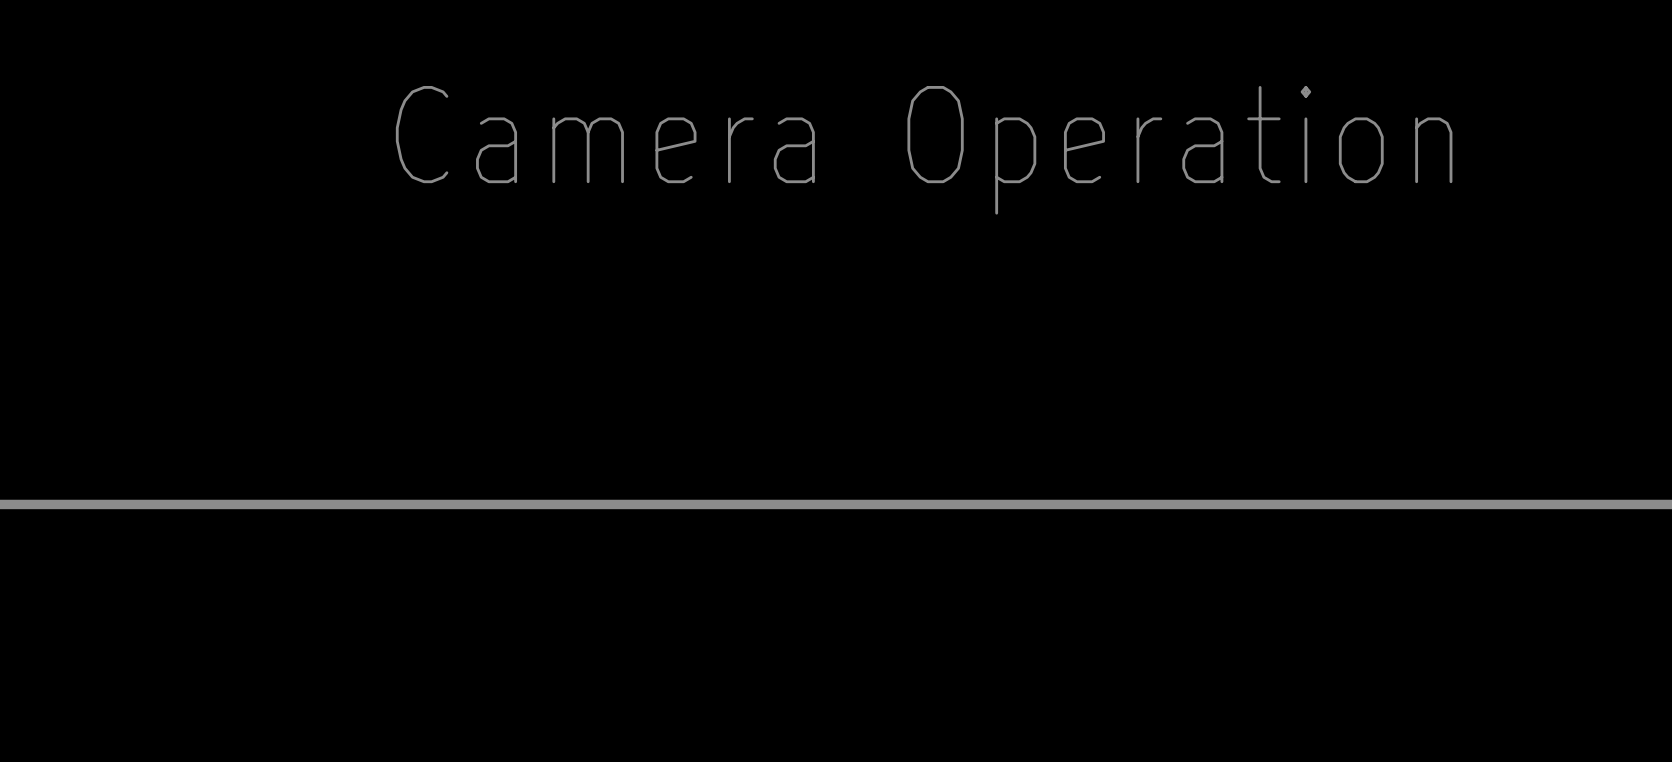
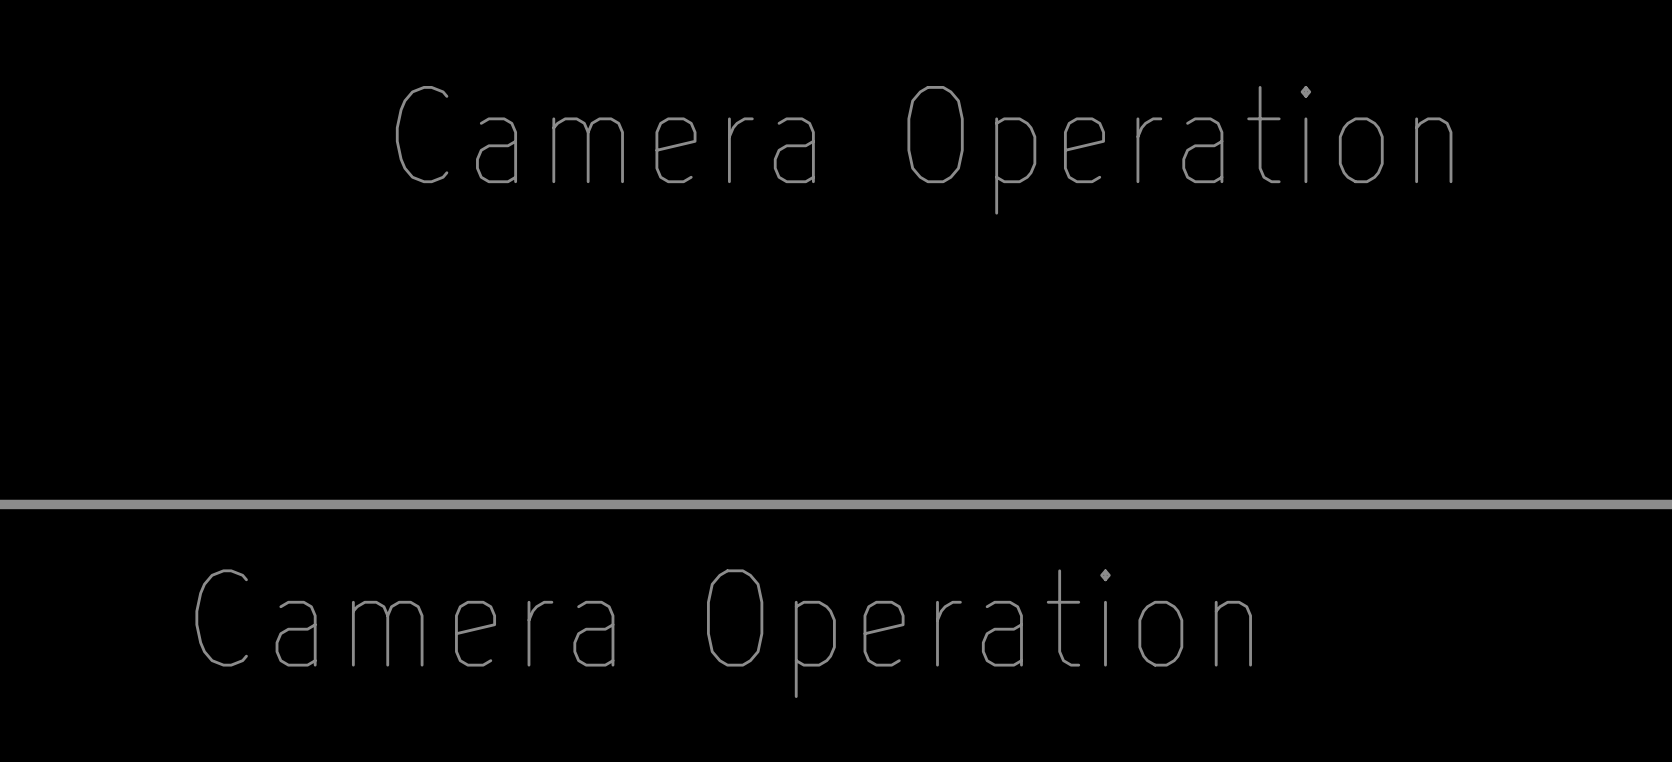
text: none -> Camera Operation (723, 633)

